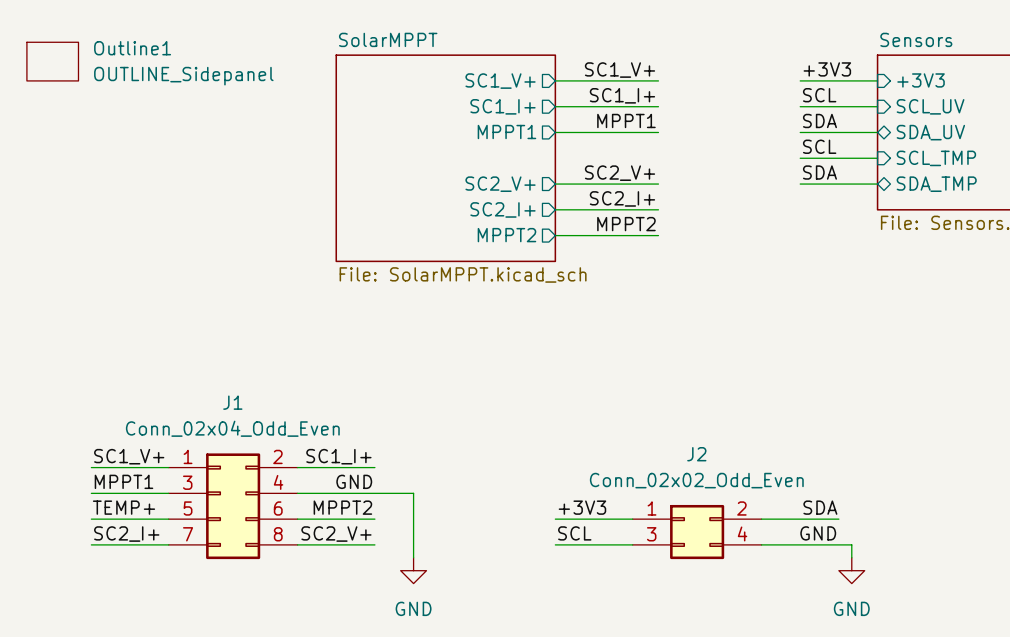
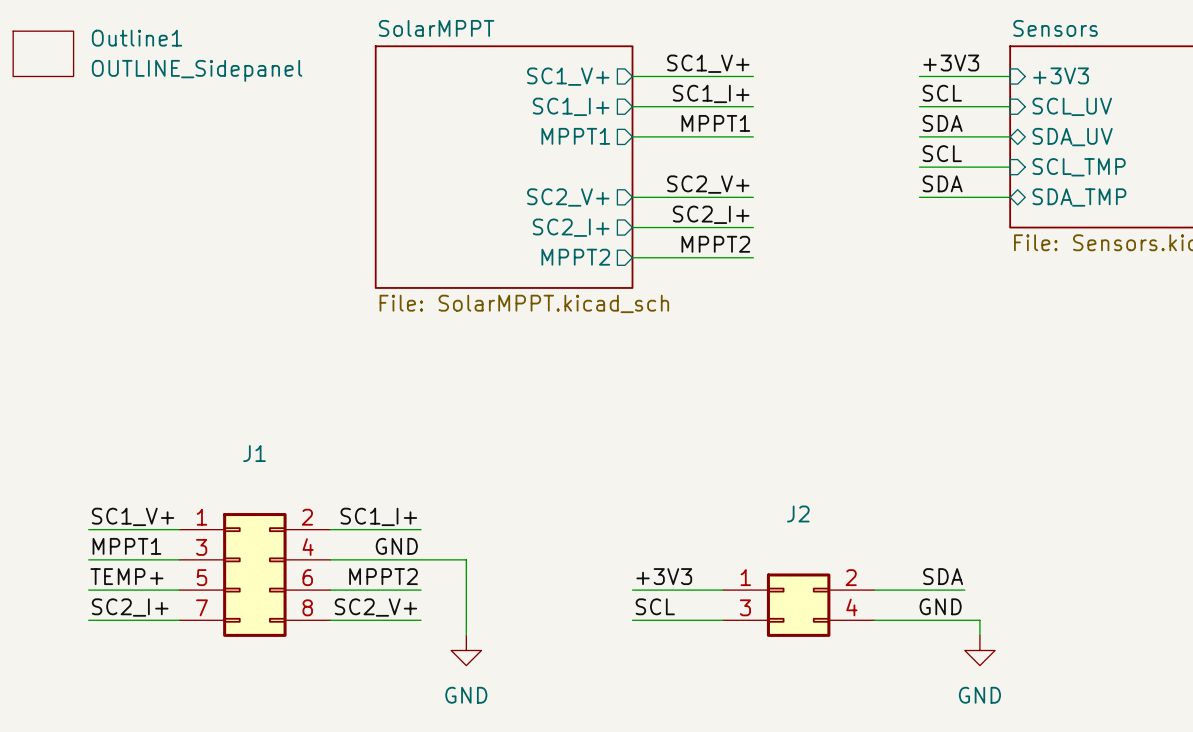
J1 value: Conn_02x04_Odd_Even (232, 428) -> none
J2 value: Conn_02x02_Odd_Even (696, 480) -> none

